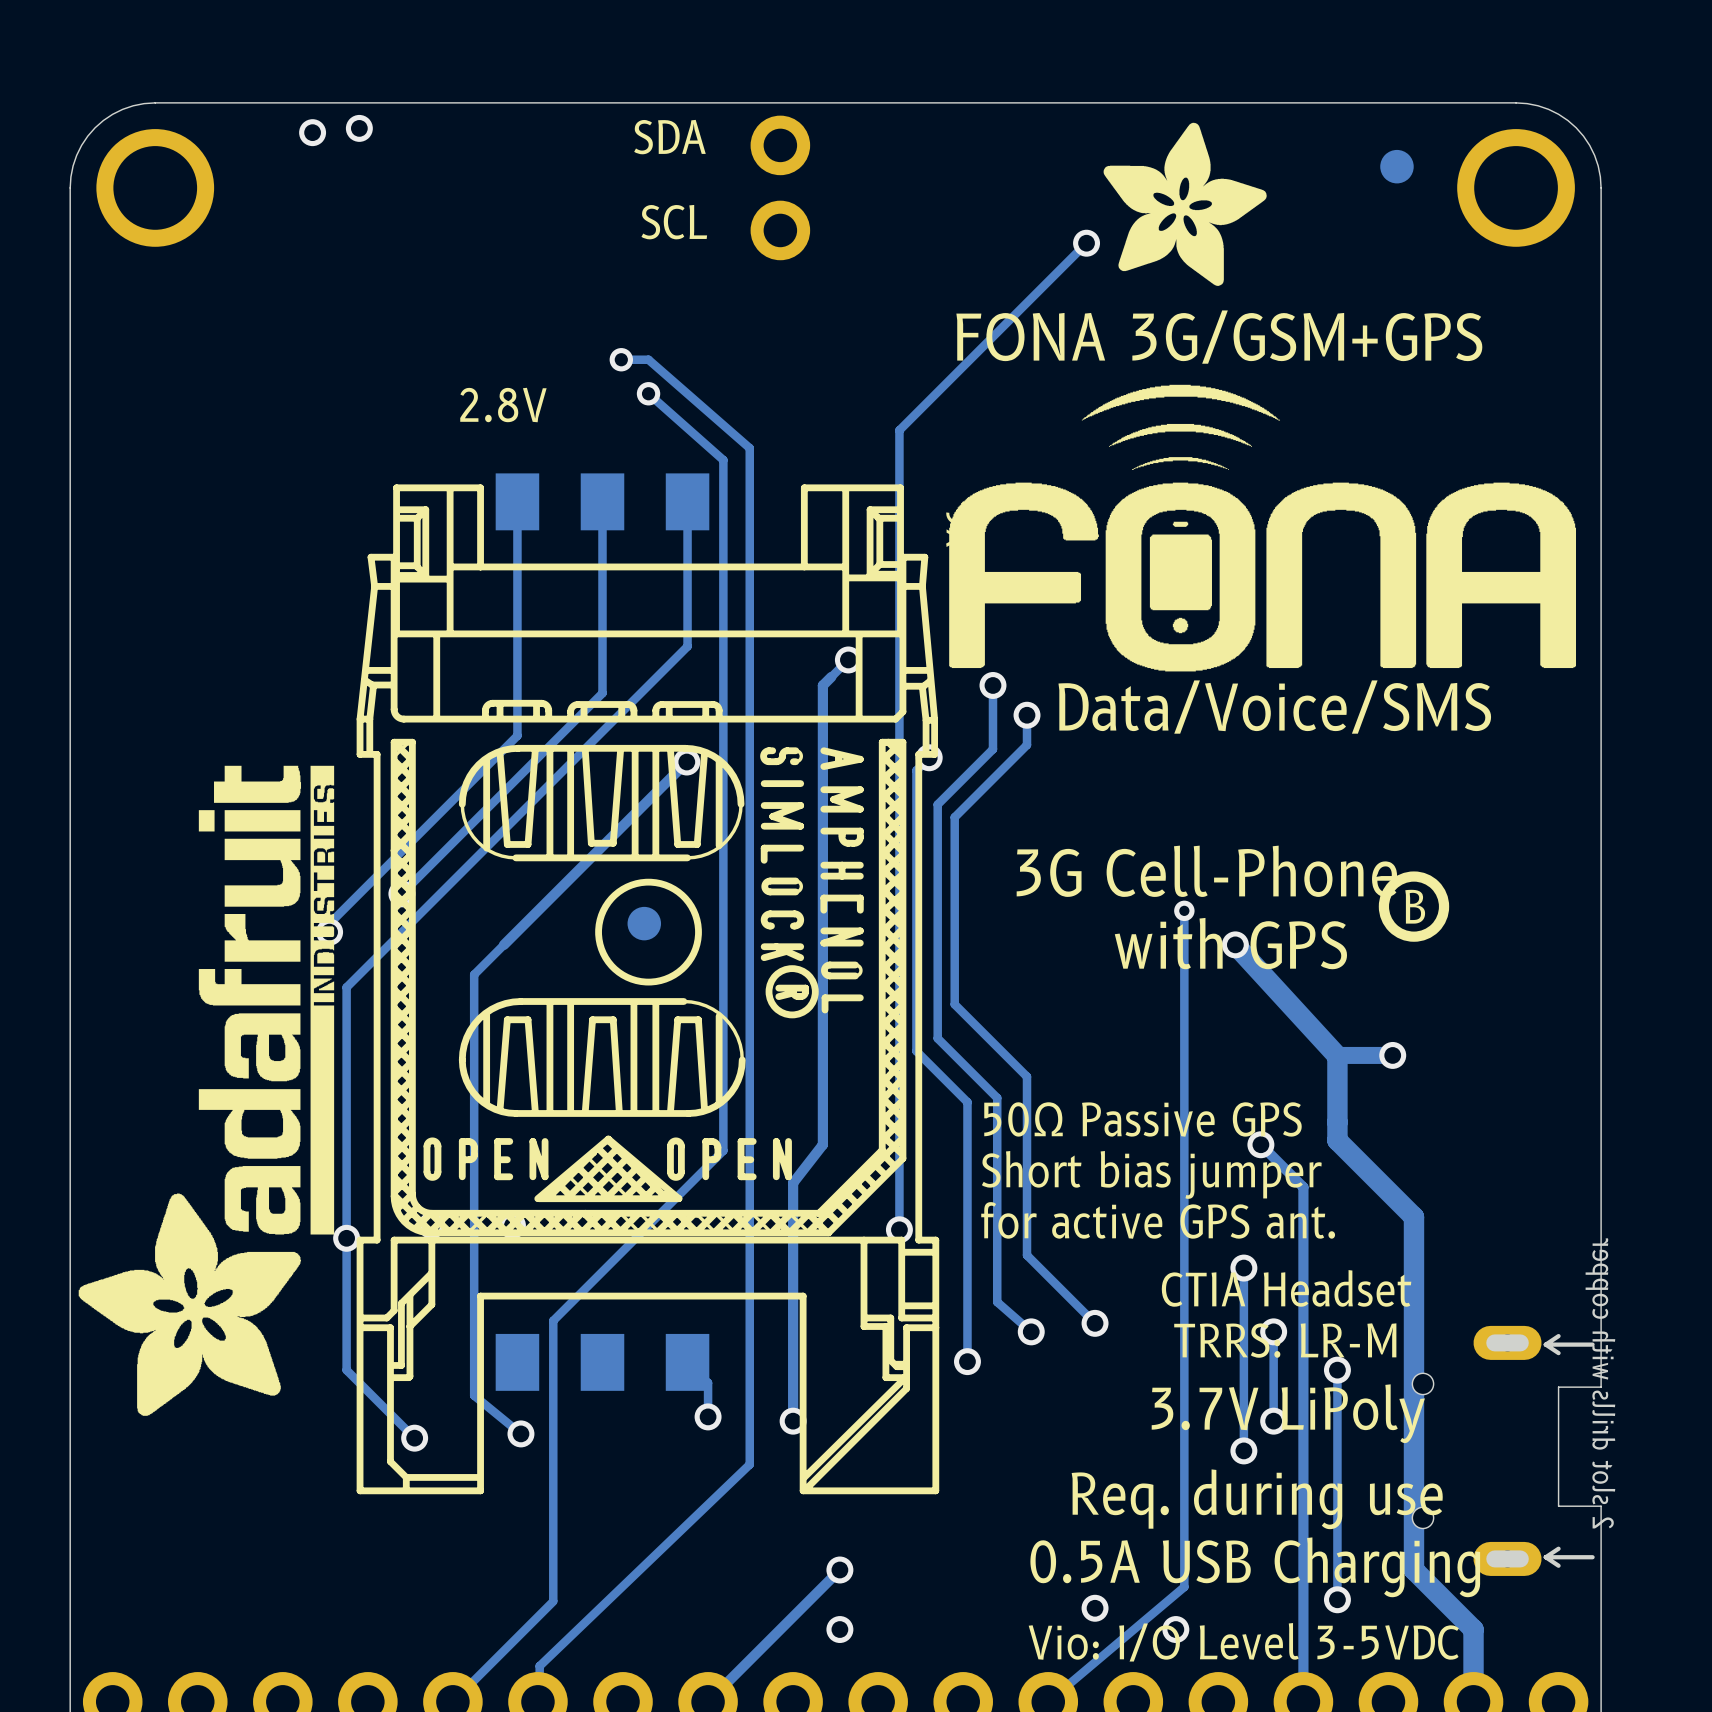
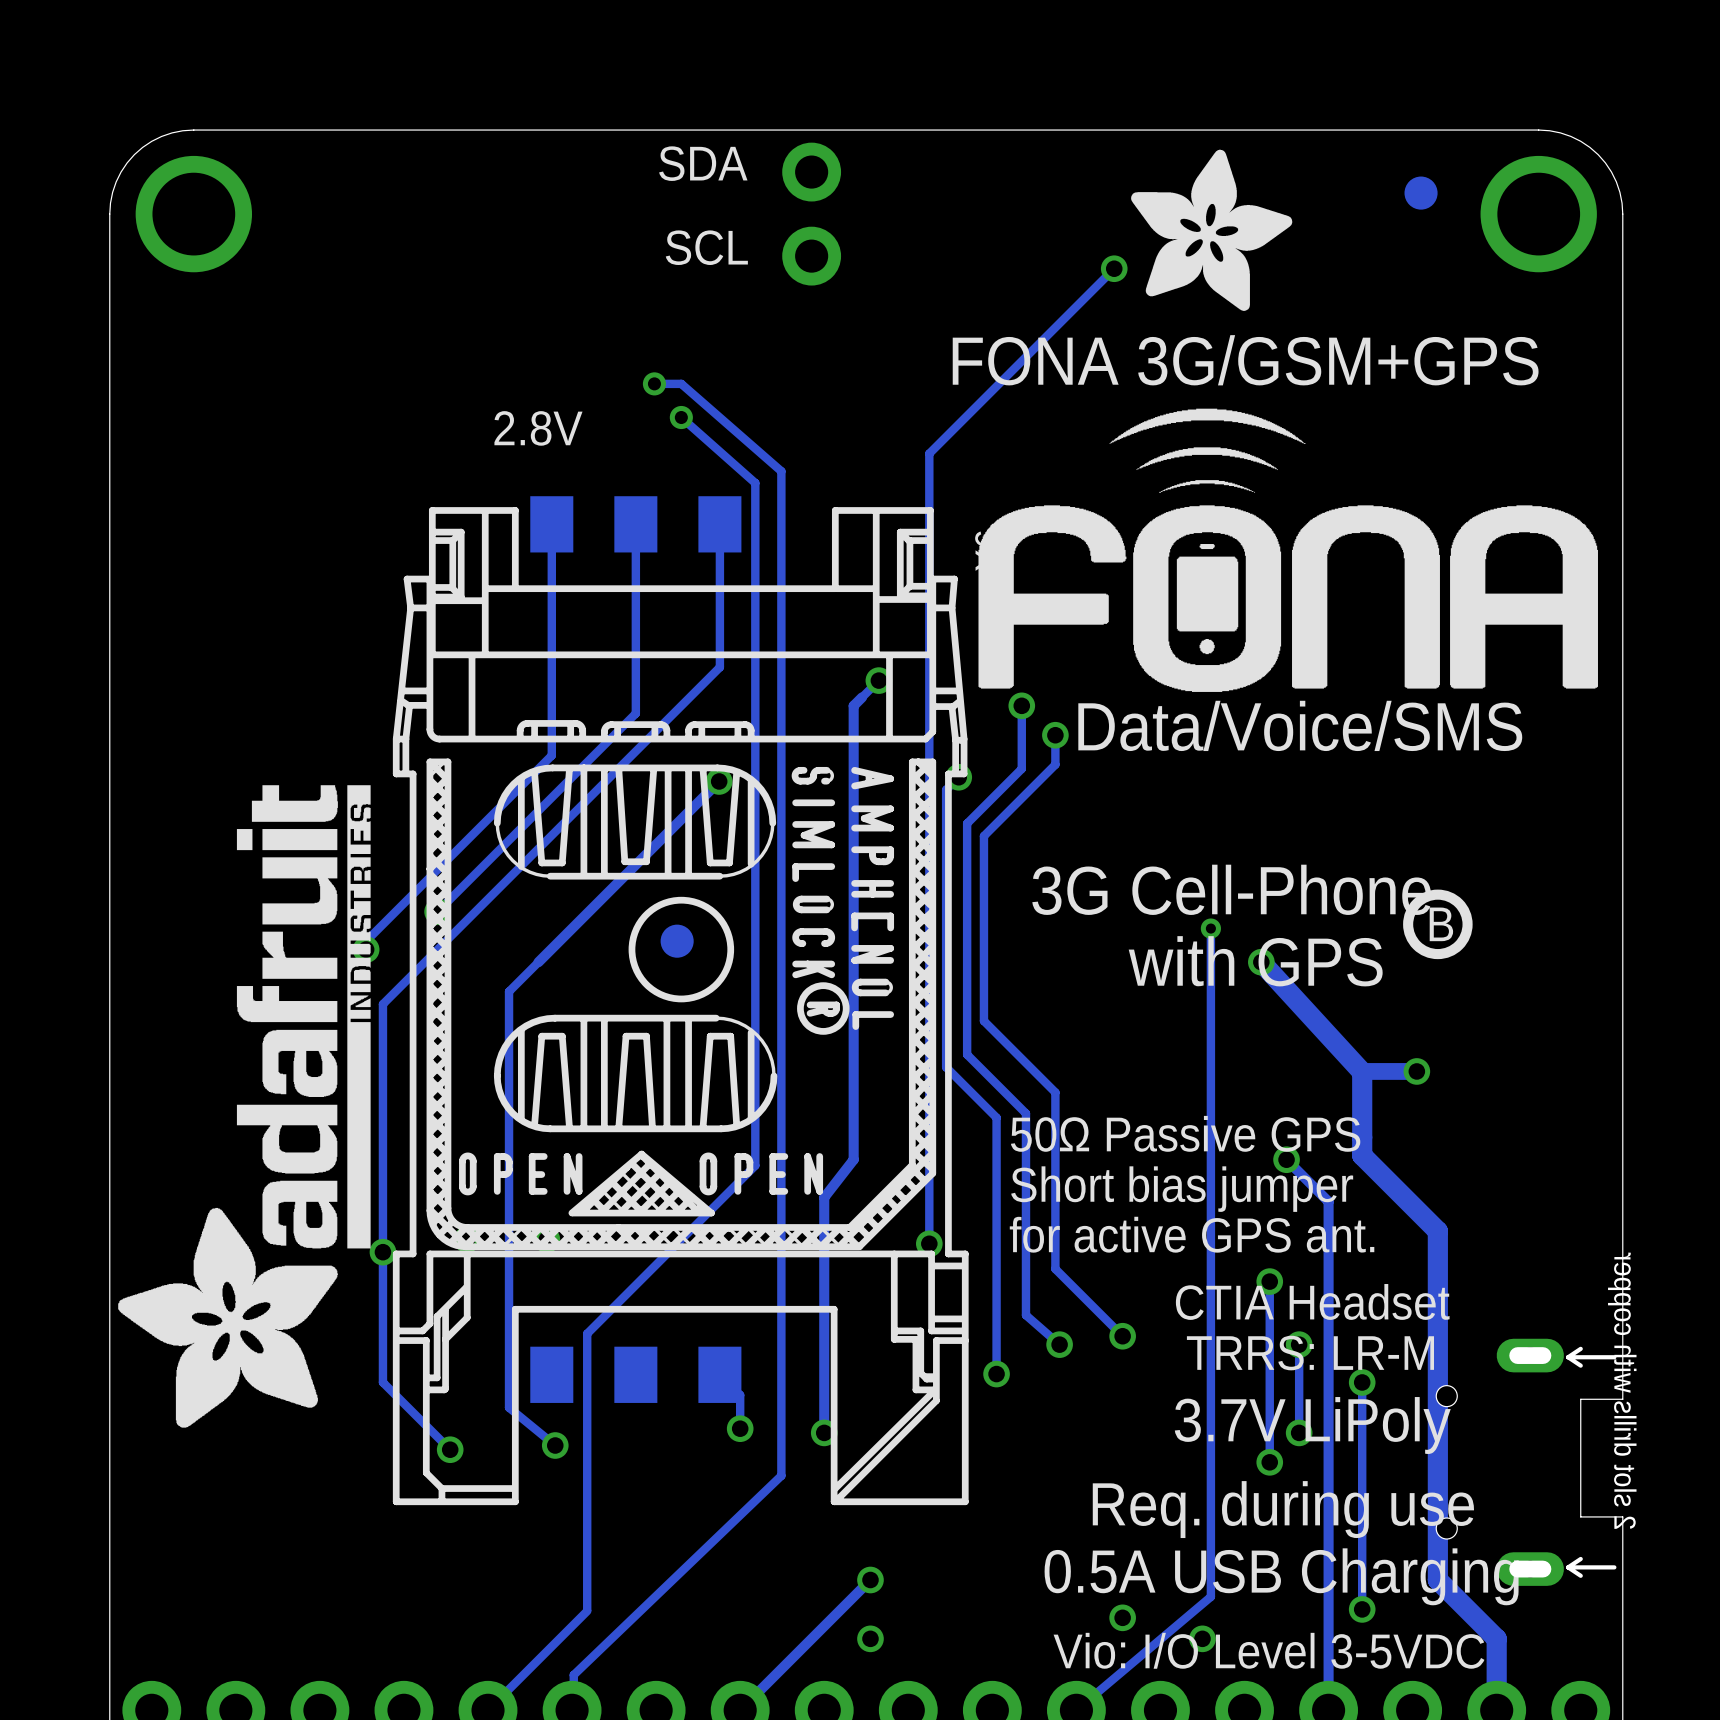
via: (359, 128) -> none
via: (312, 132) -> none

